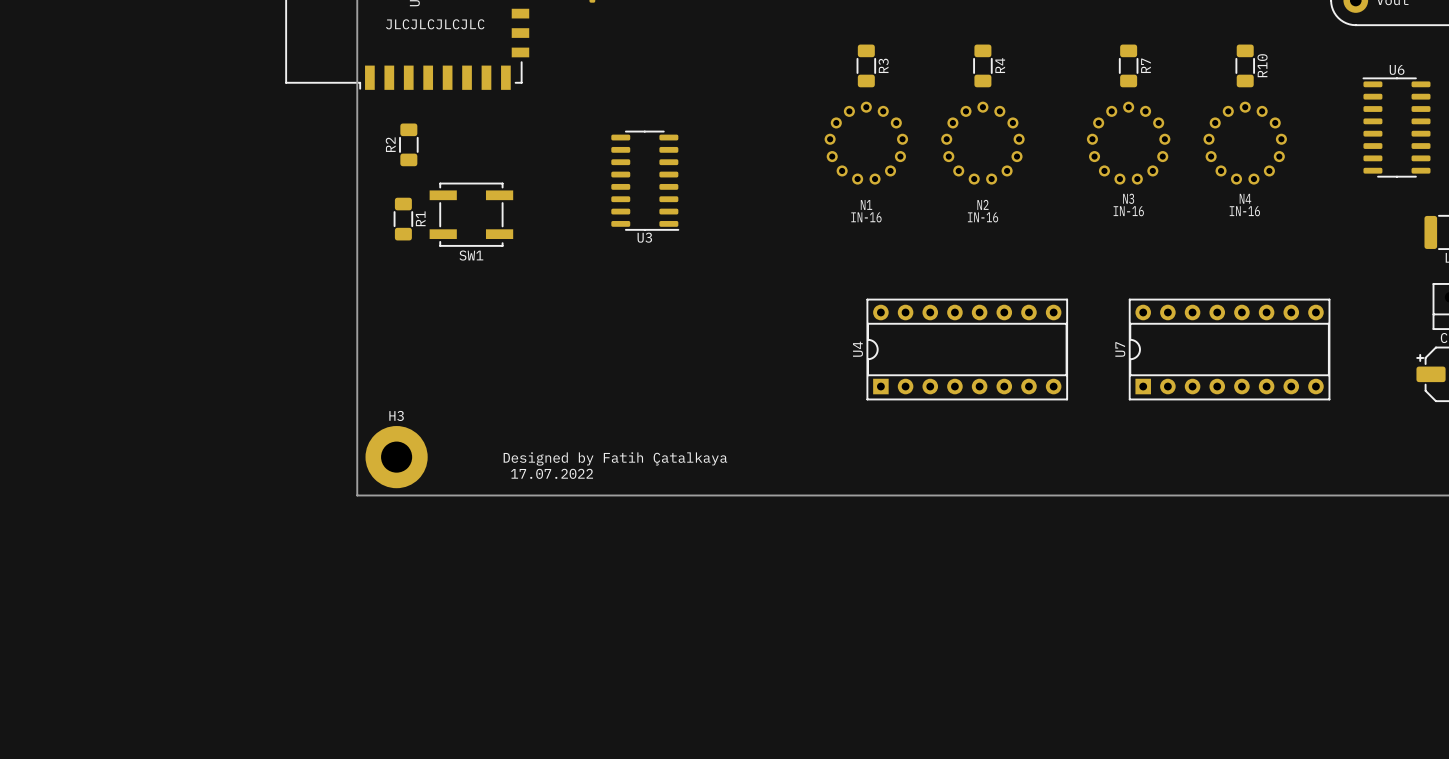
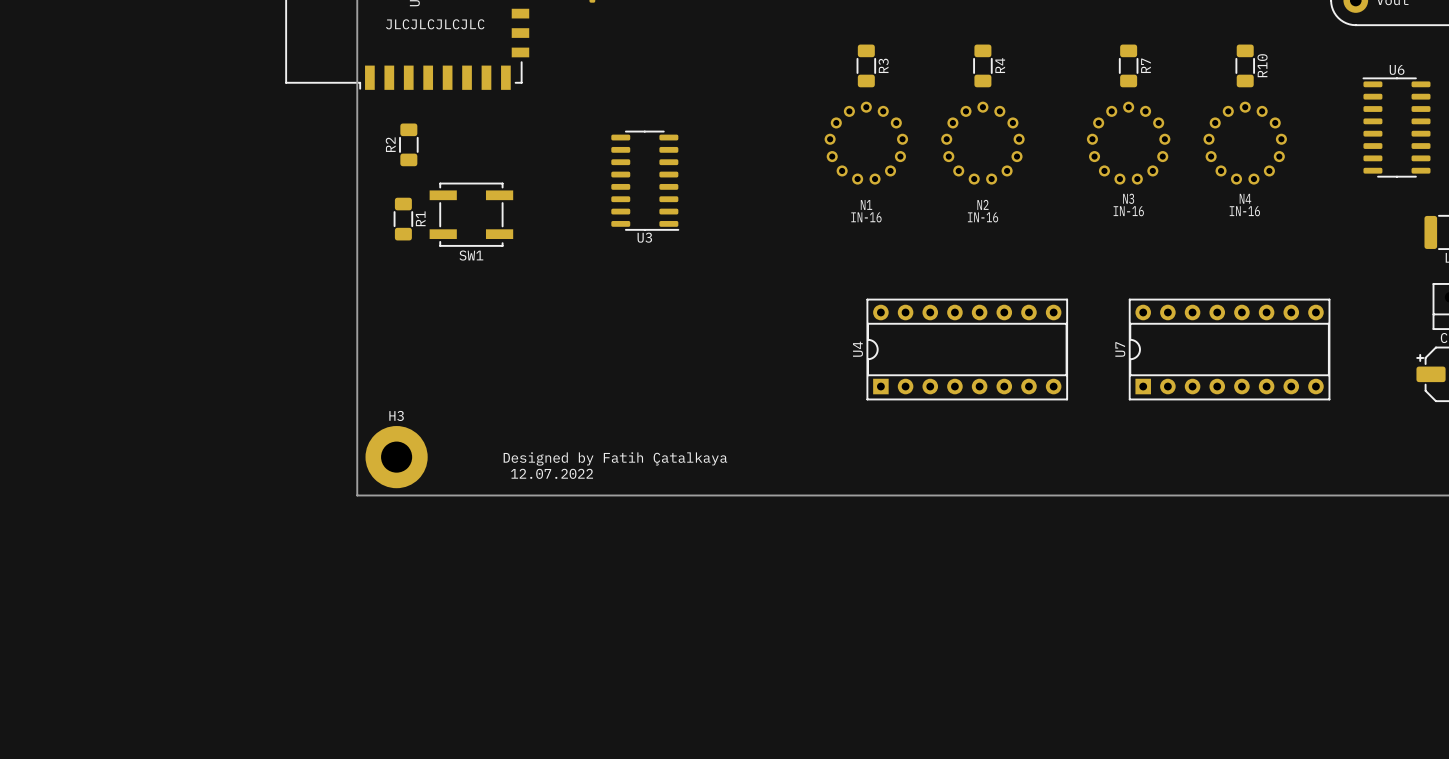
text: 17.07.2022 (552, 473) -> 12.07.2022 (552, 473)

